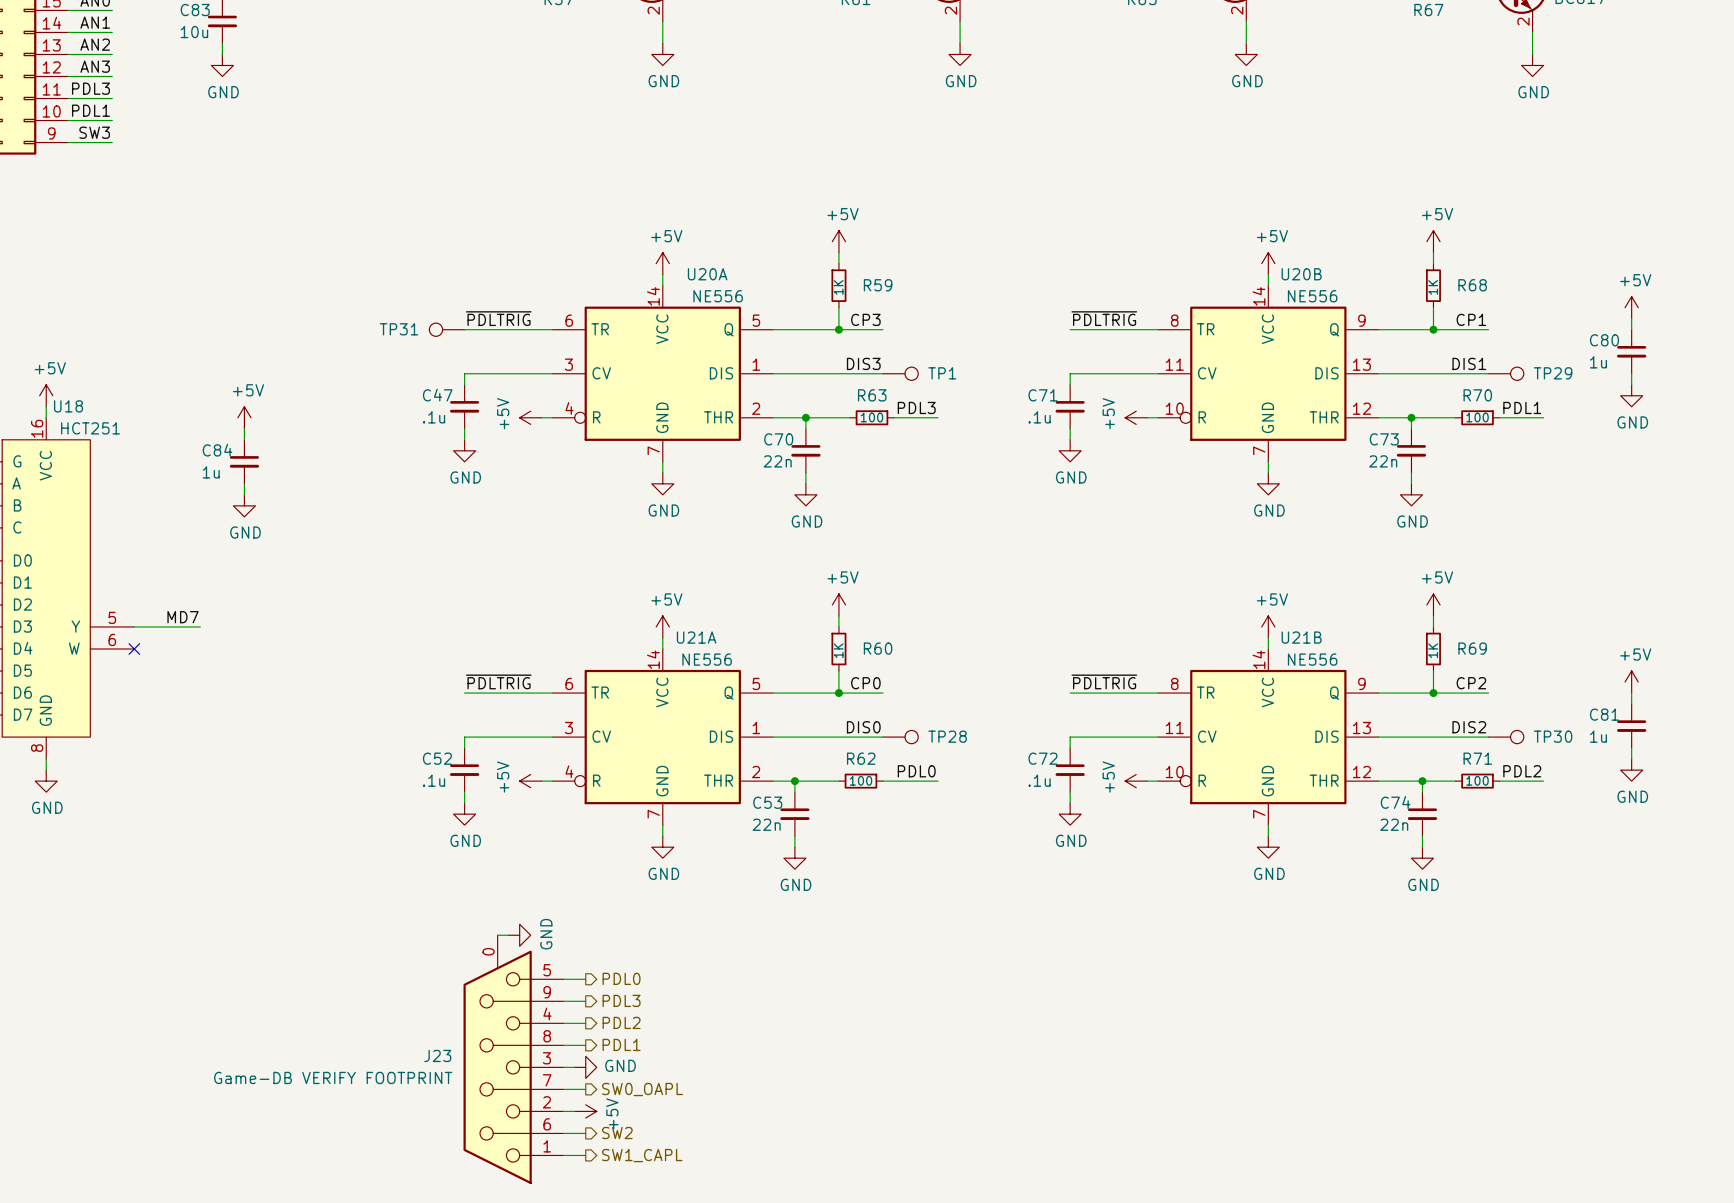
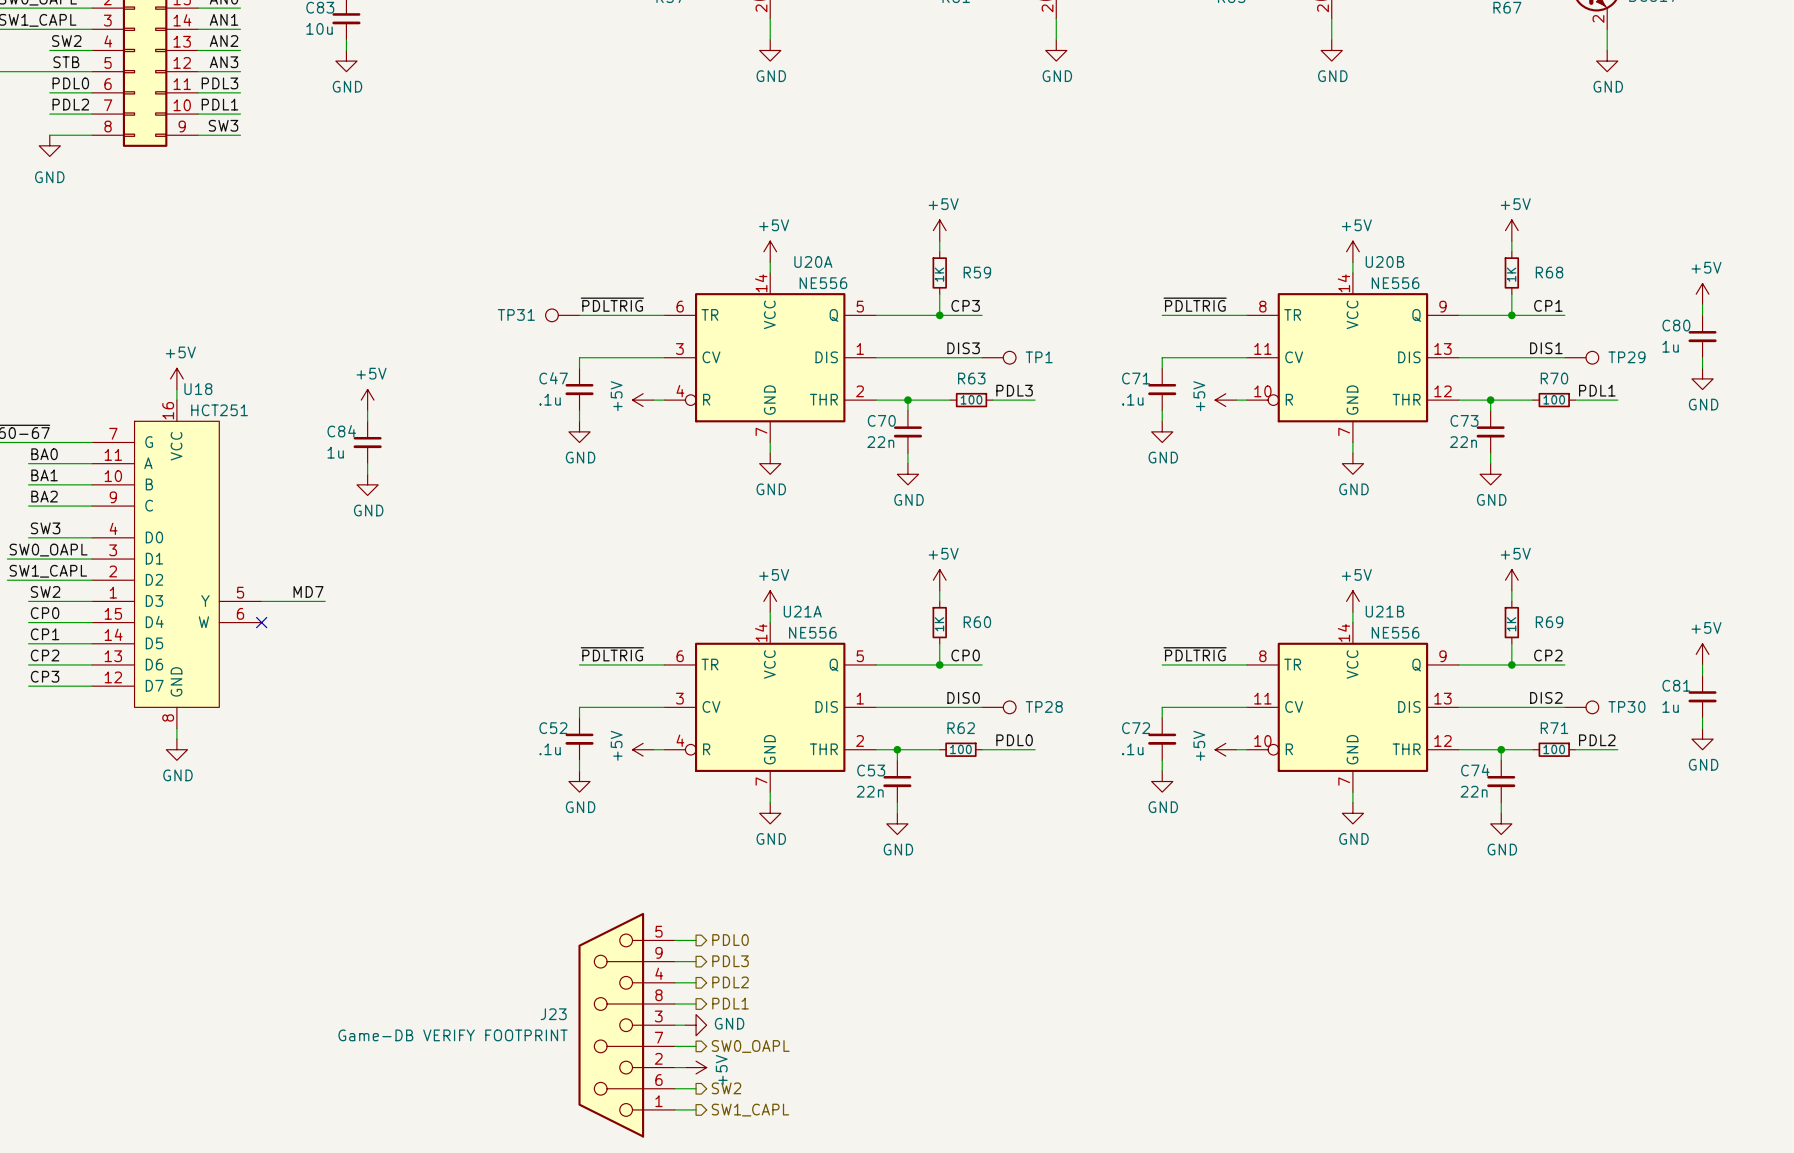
J23 symbol: [463, 935, 564, 1185] -> [578, 912, 675, 1138]
wire: (497, 935) (508, 935) -> none
power symbol: GND (519, 935) -> none

